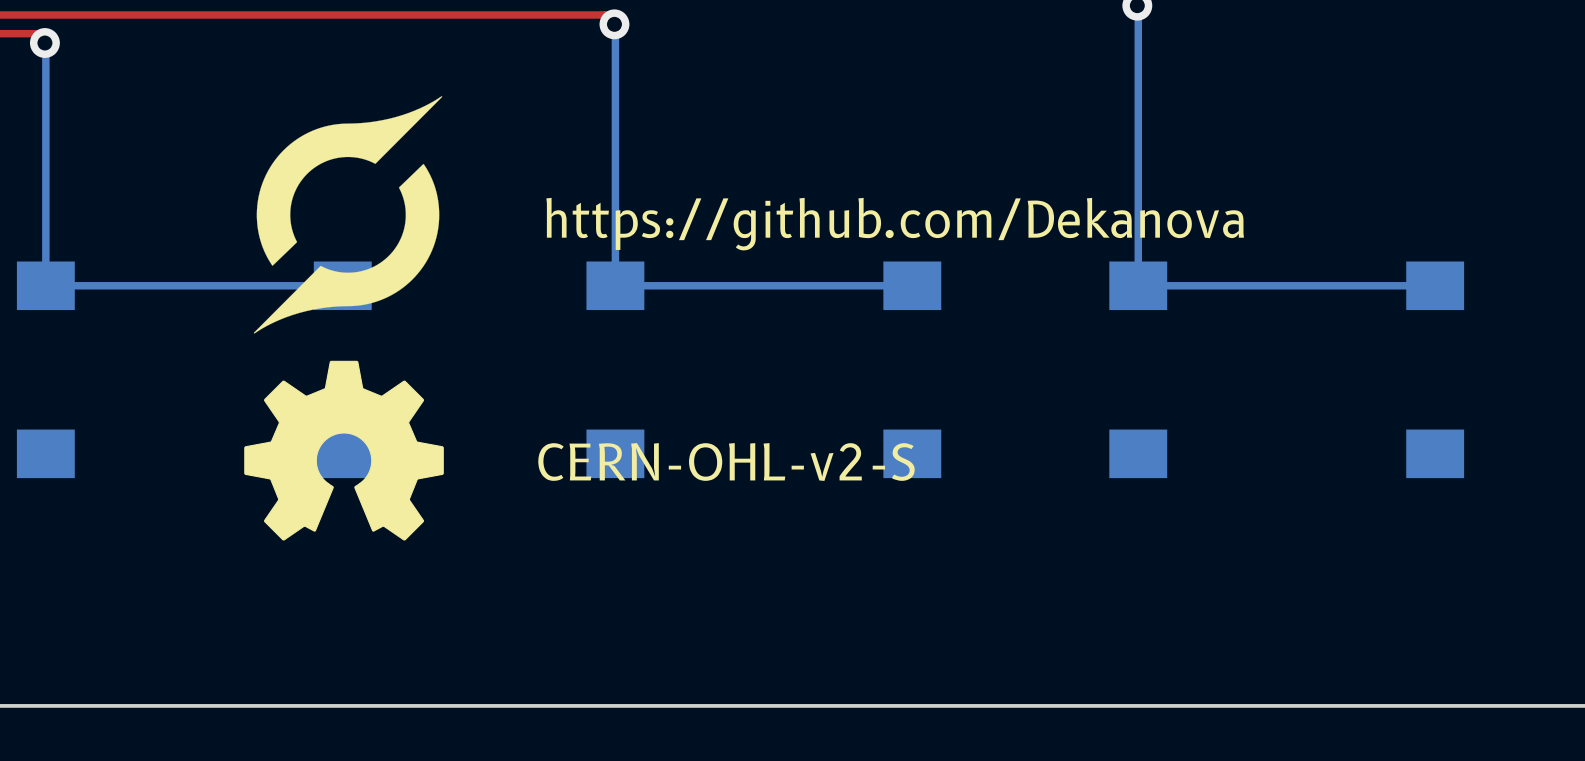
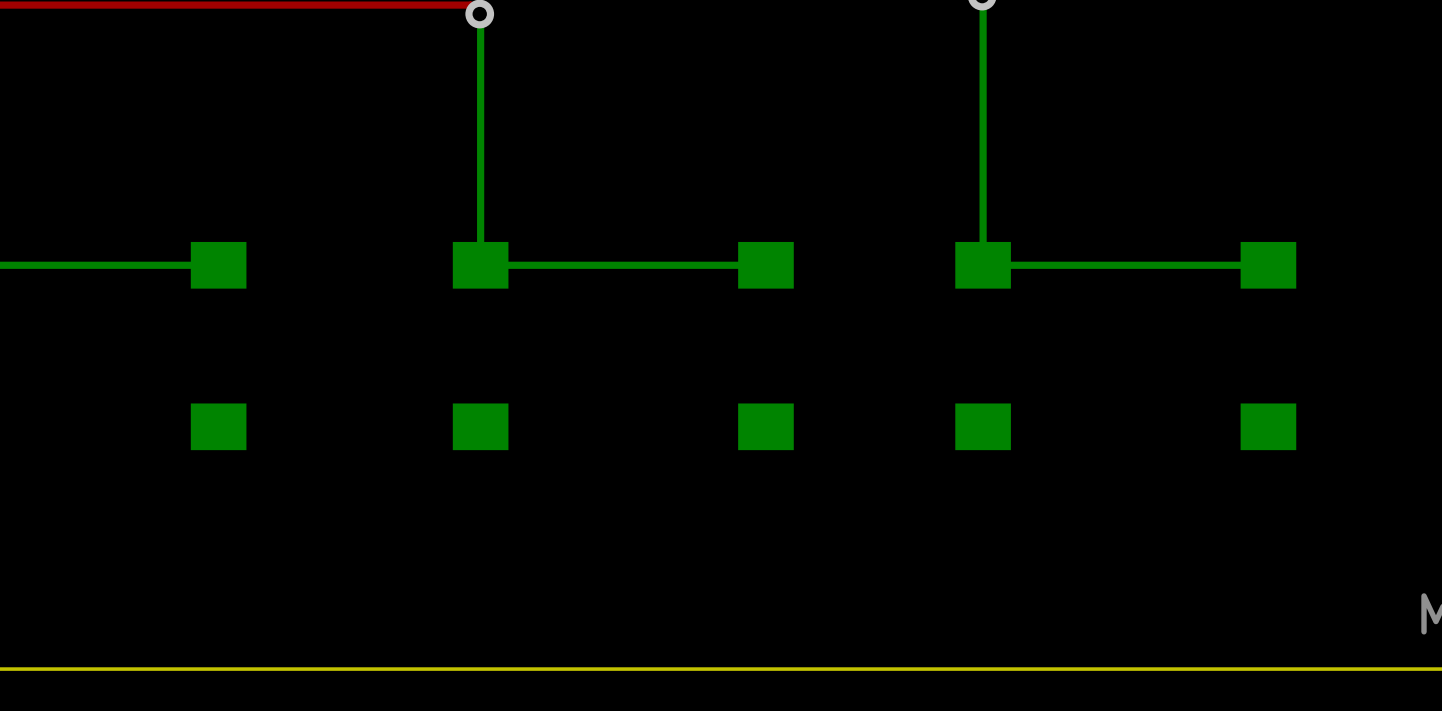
drawing: [244, 96, 444, 541] -> none
text: https://github.com/Dekanova (895, 224) -> none
text: CERN-OHL-v2-S (726, 462) -> none

